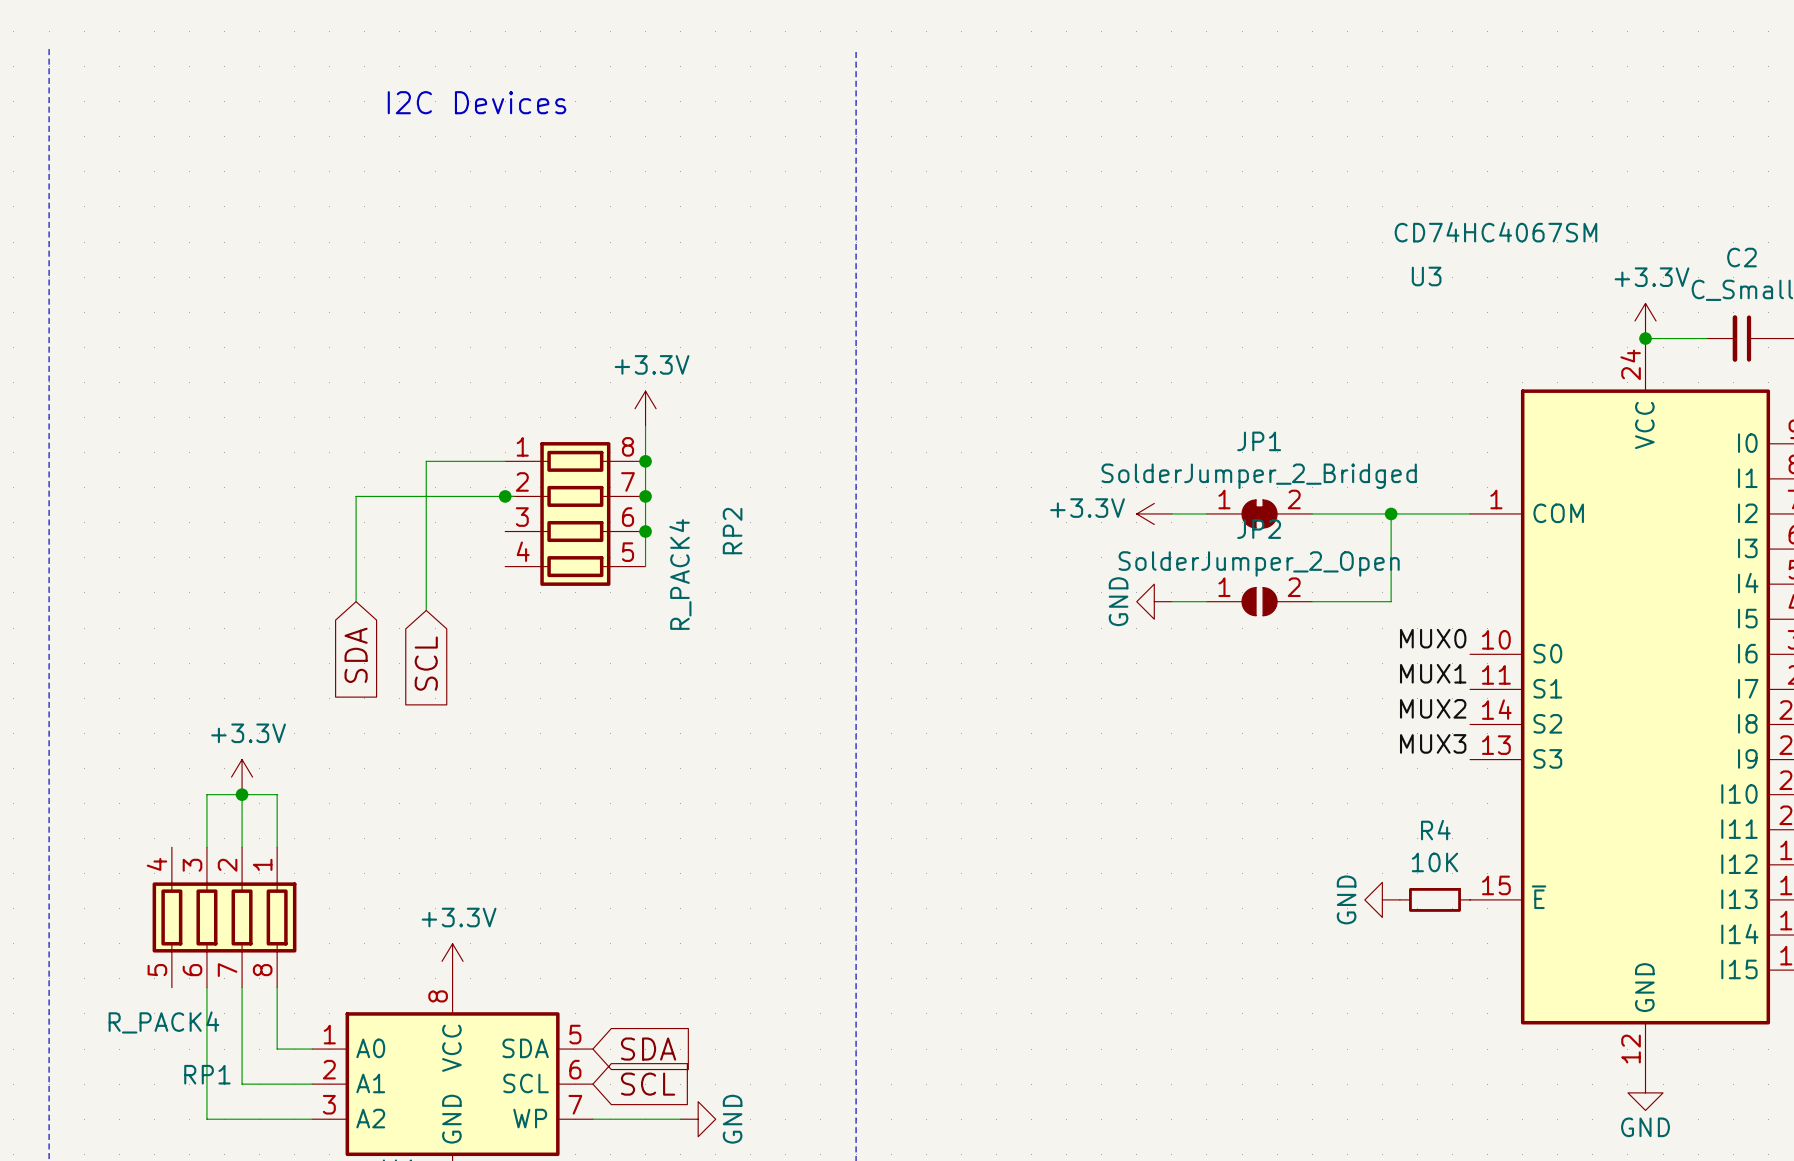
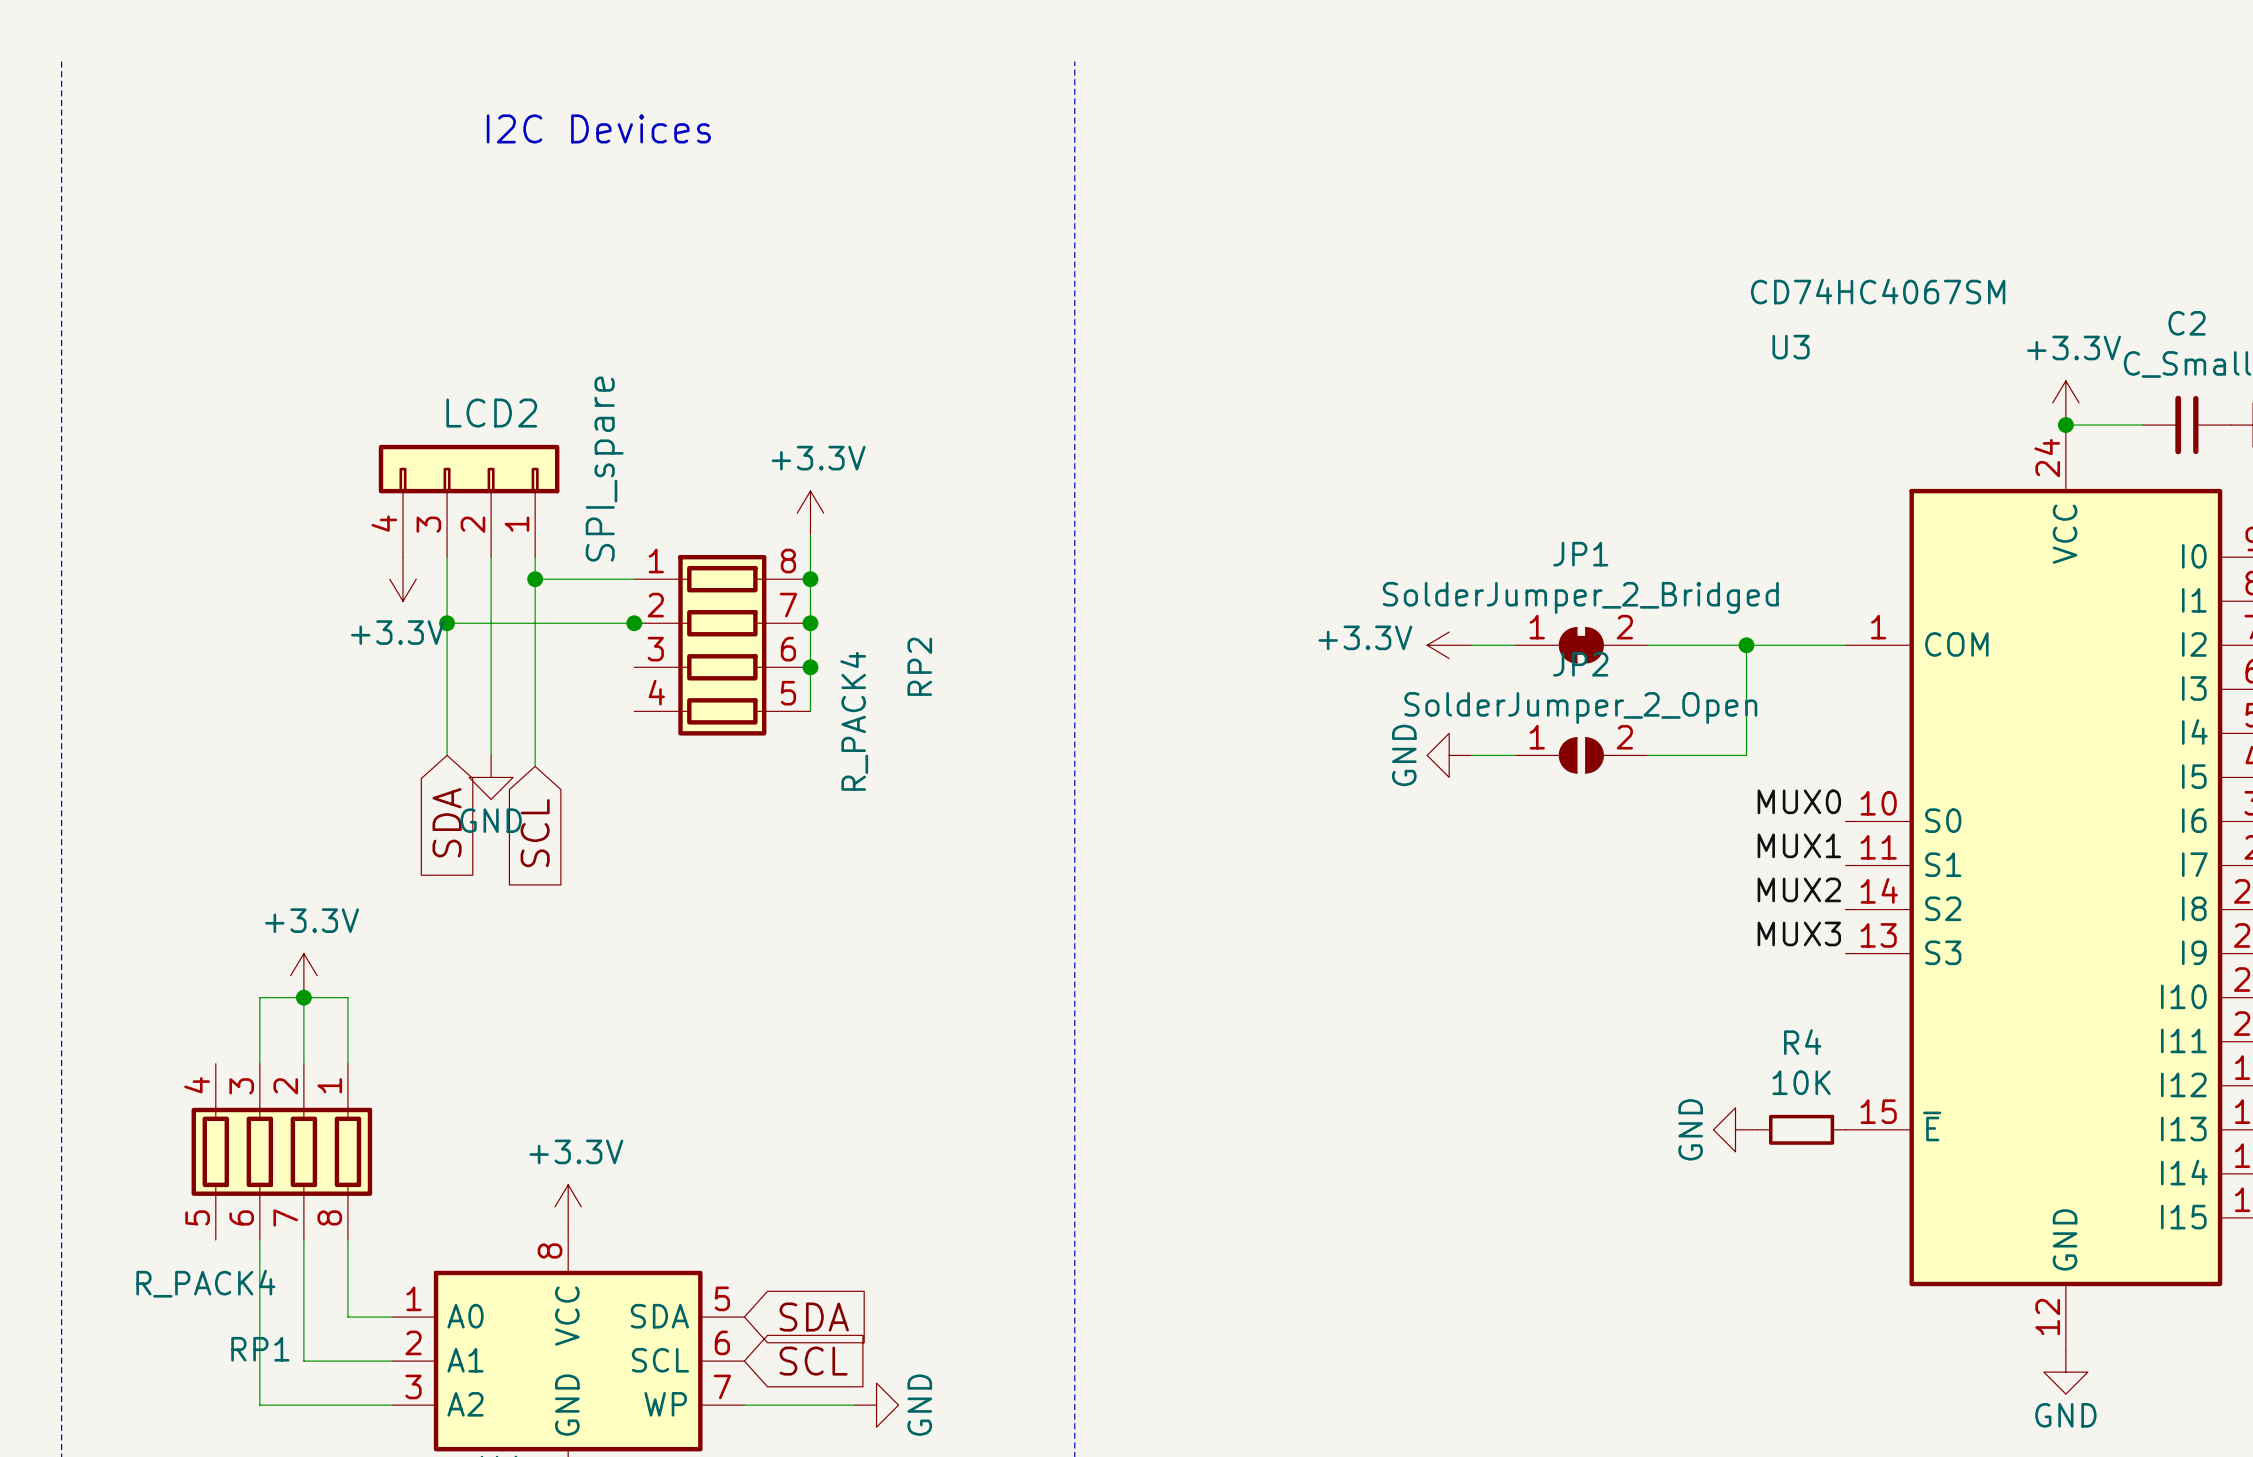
LCD2: none -> SPI_spare (469, 501)
wire: none -> (447, 557) (447, 623)
wire: none -> (491, 557) (491, 755)
wire: none -> (535, 557) (535, 579)
power symbol: none -> +3.3V (403, 579)
junction: none -> (535, 579)
junction: none -> (447, 623)
power symbol: none -> GND (491, 777)

